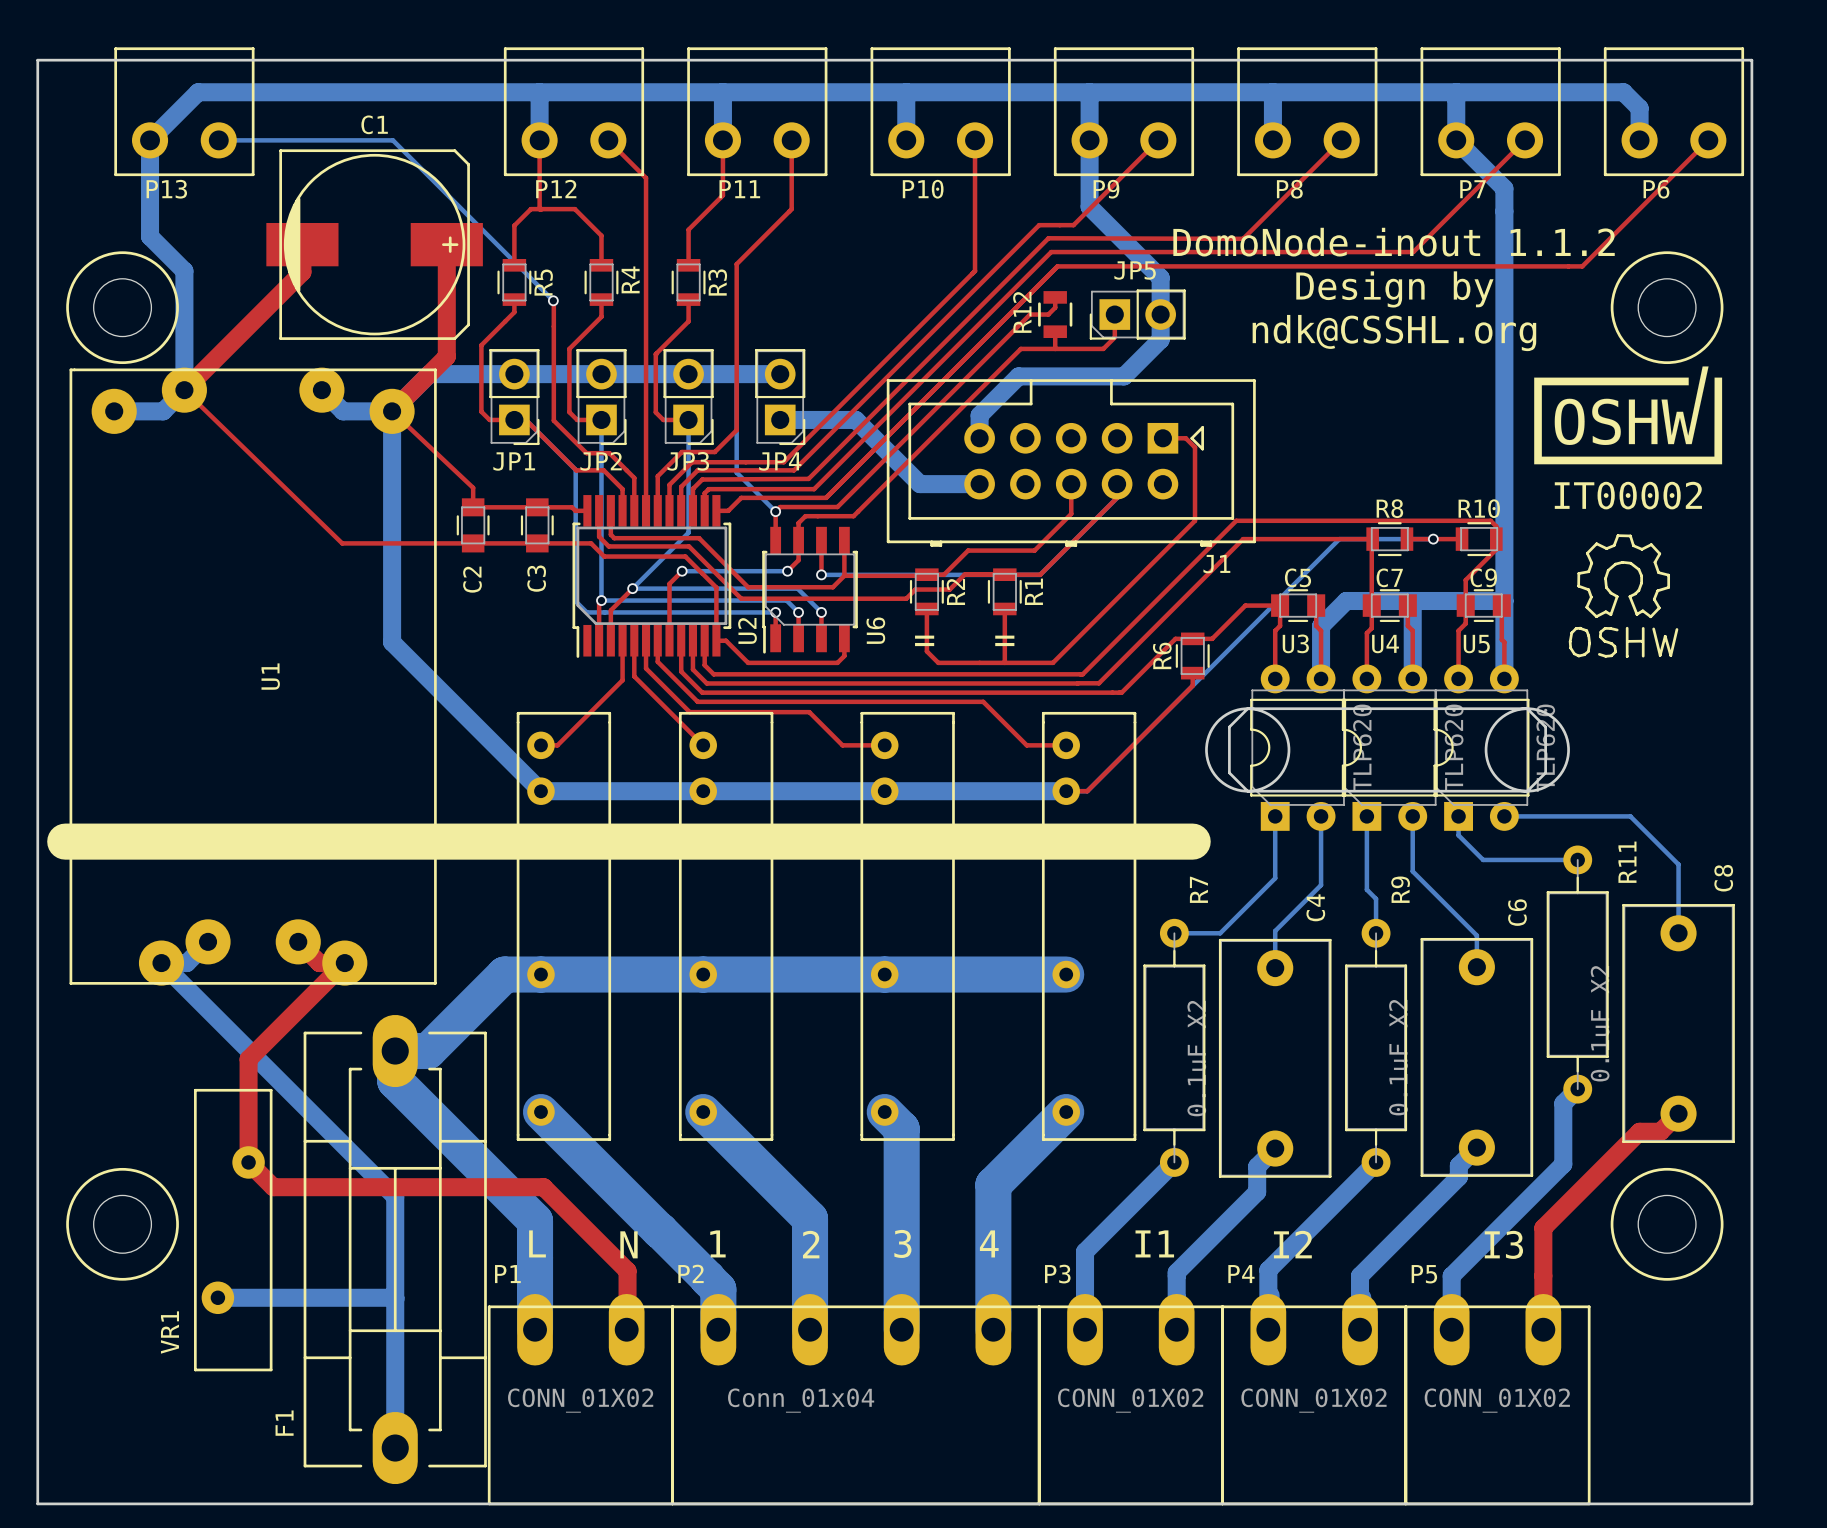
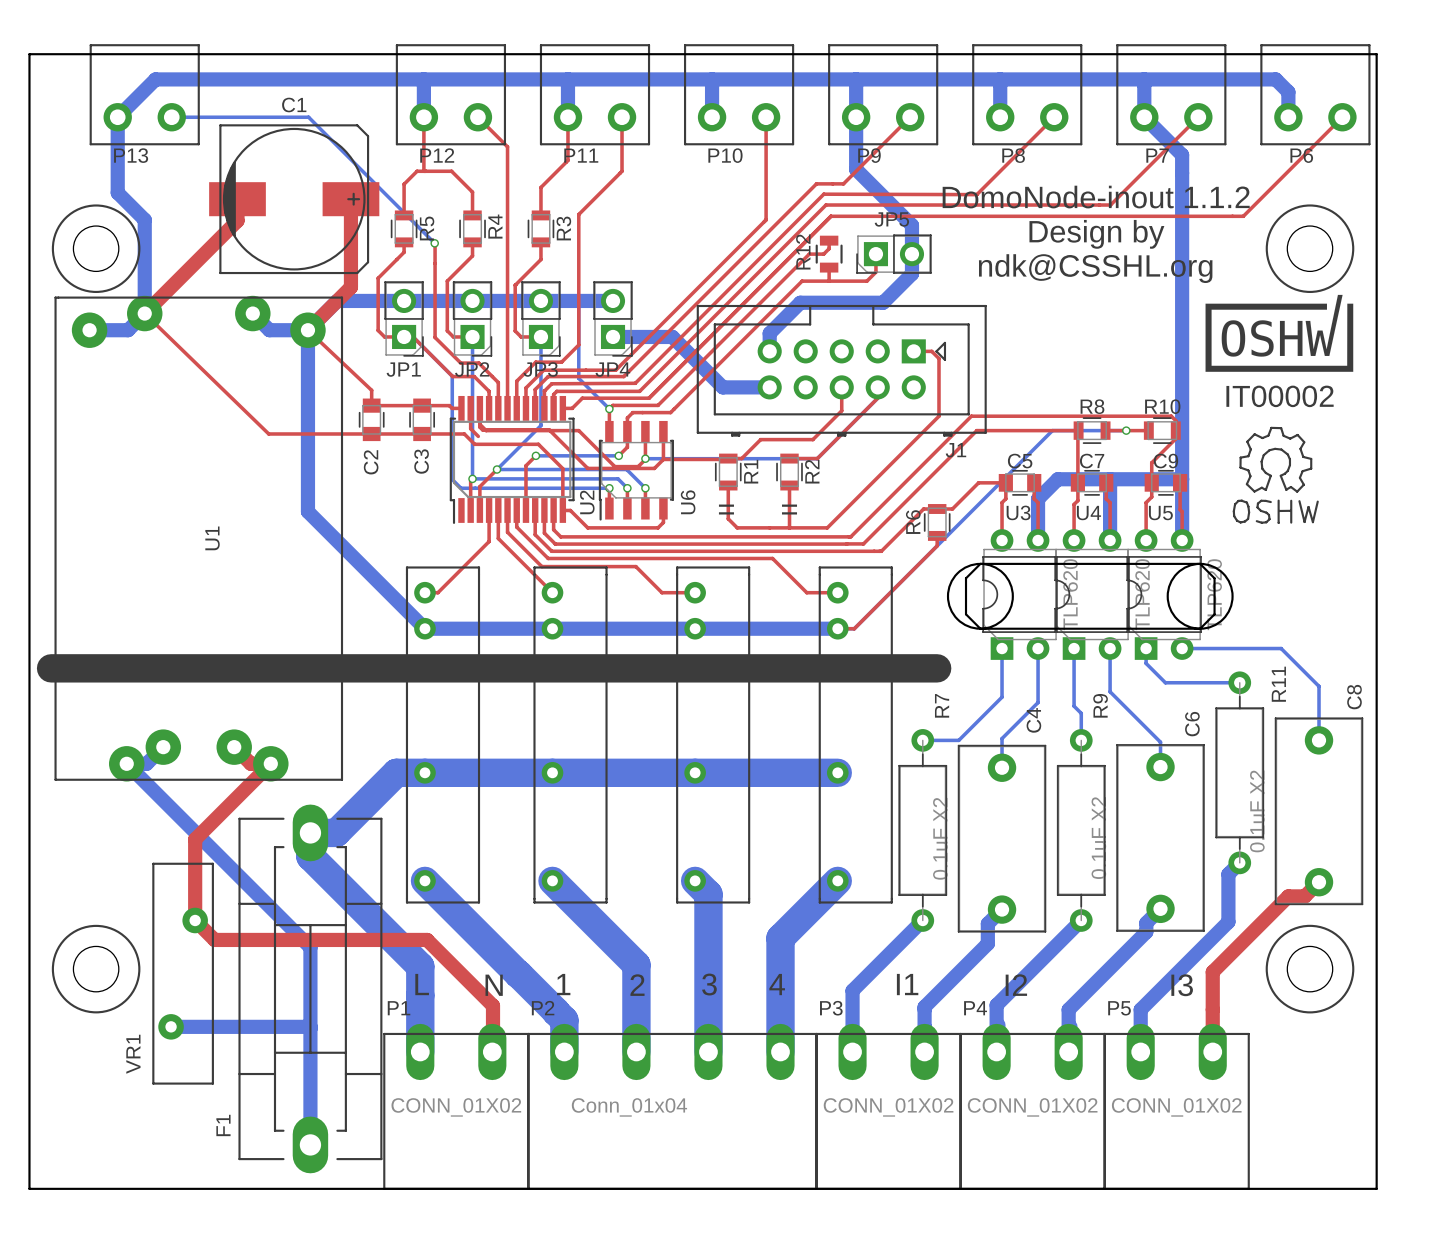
top track: none -> (479, 424) (486, 430) (578, 430) (614, 466) (638, 466) (645, 458)
top track: (608, 546) (689, 546) (741, 598) (906, 598) (915, 589) (949, 589) (964, 574) (1004, 574) -> none
R1 name: R1 (1033, 591) -> R2 (812, 471)
R2 name: R2 (955, 592) -> R1 (751, 471)

